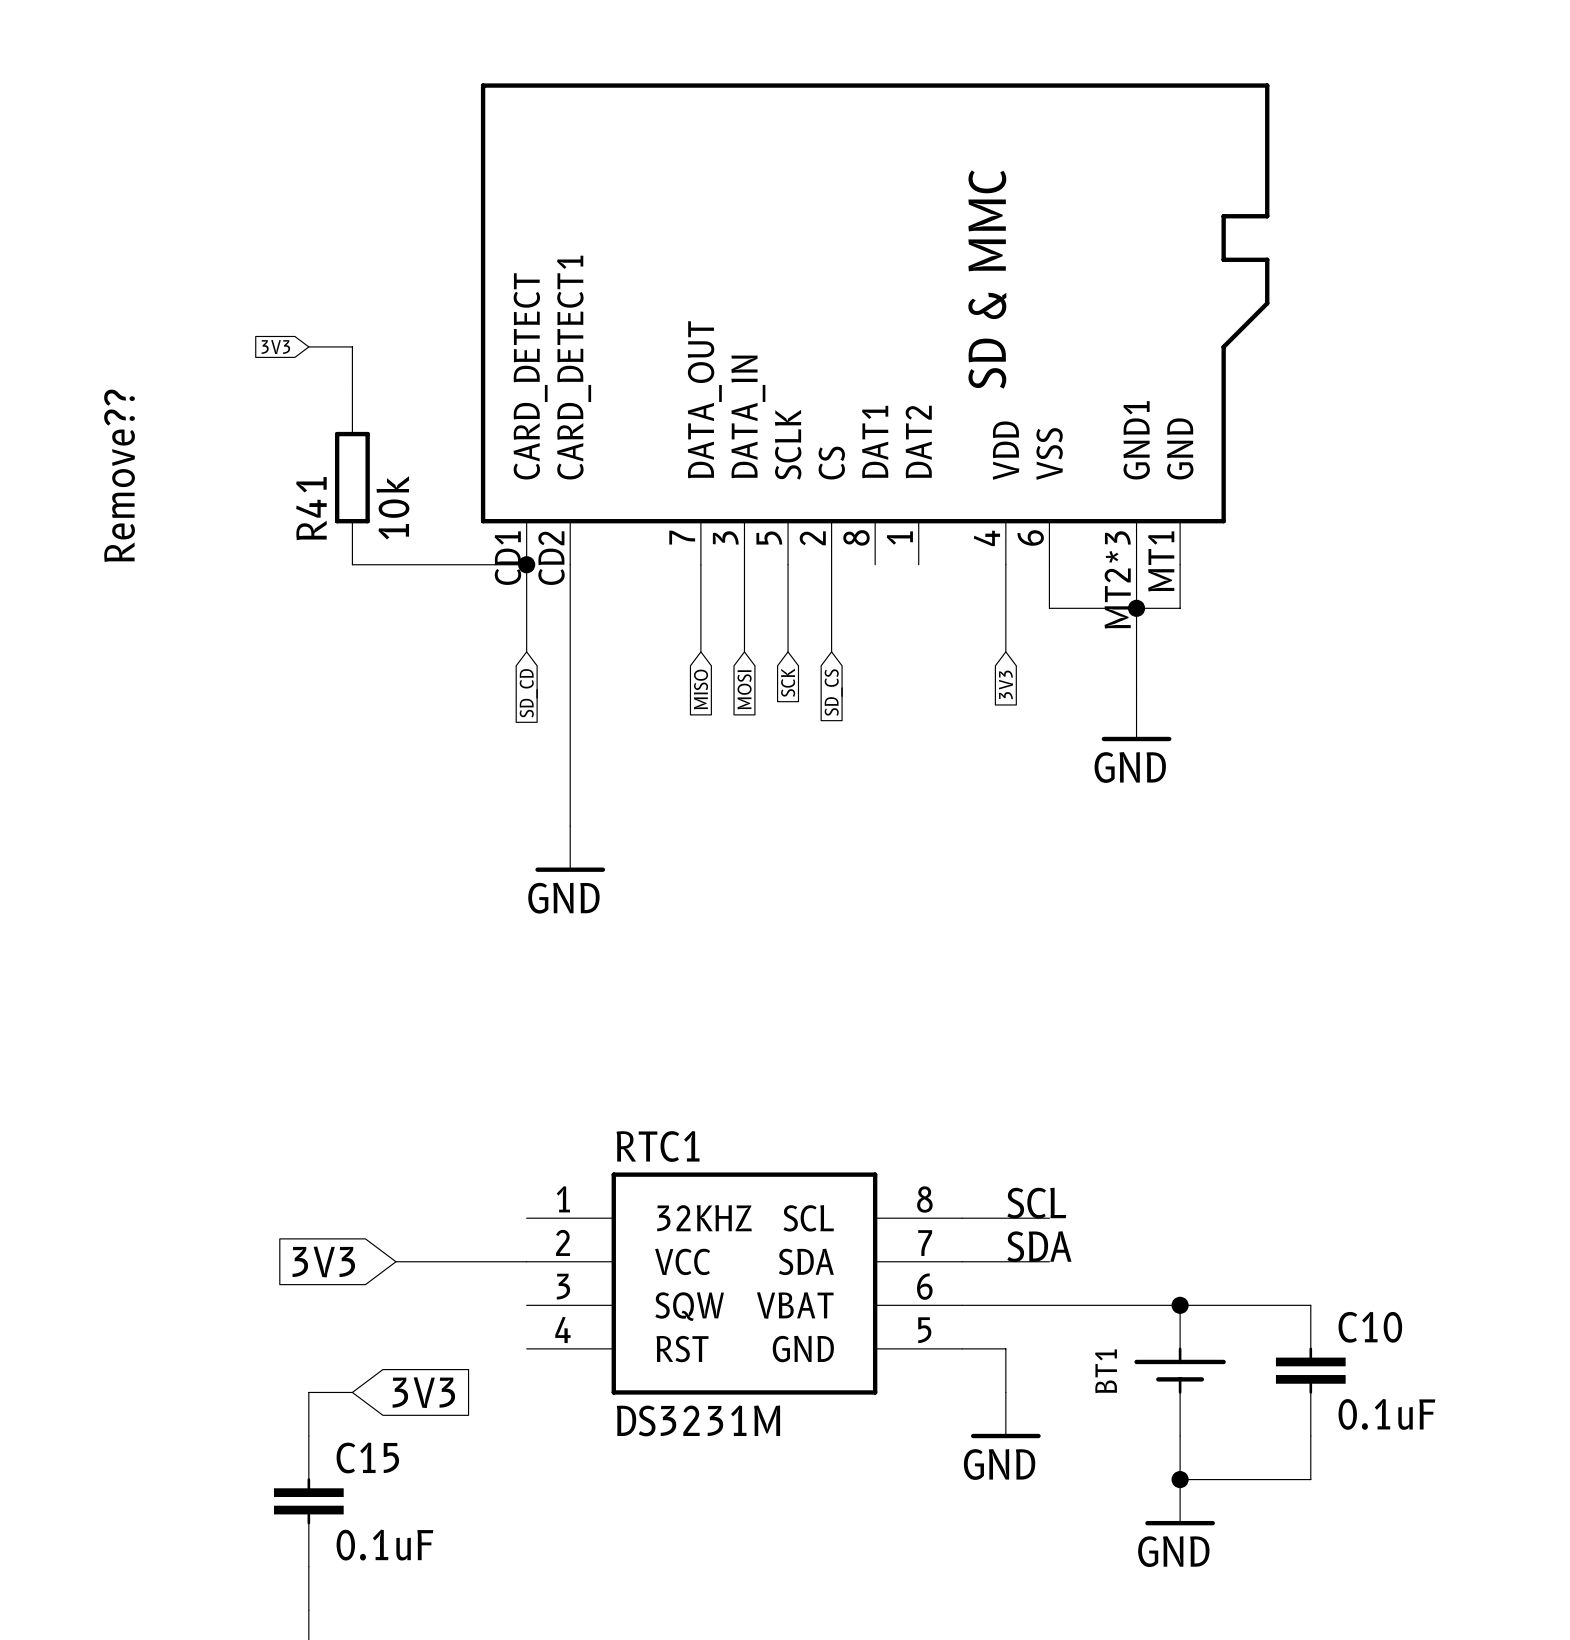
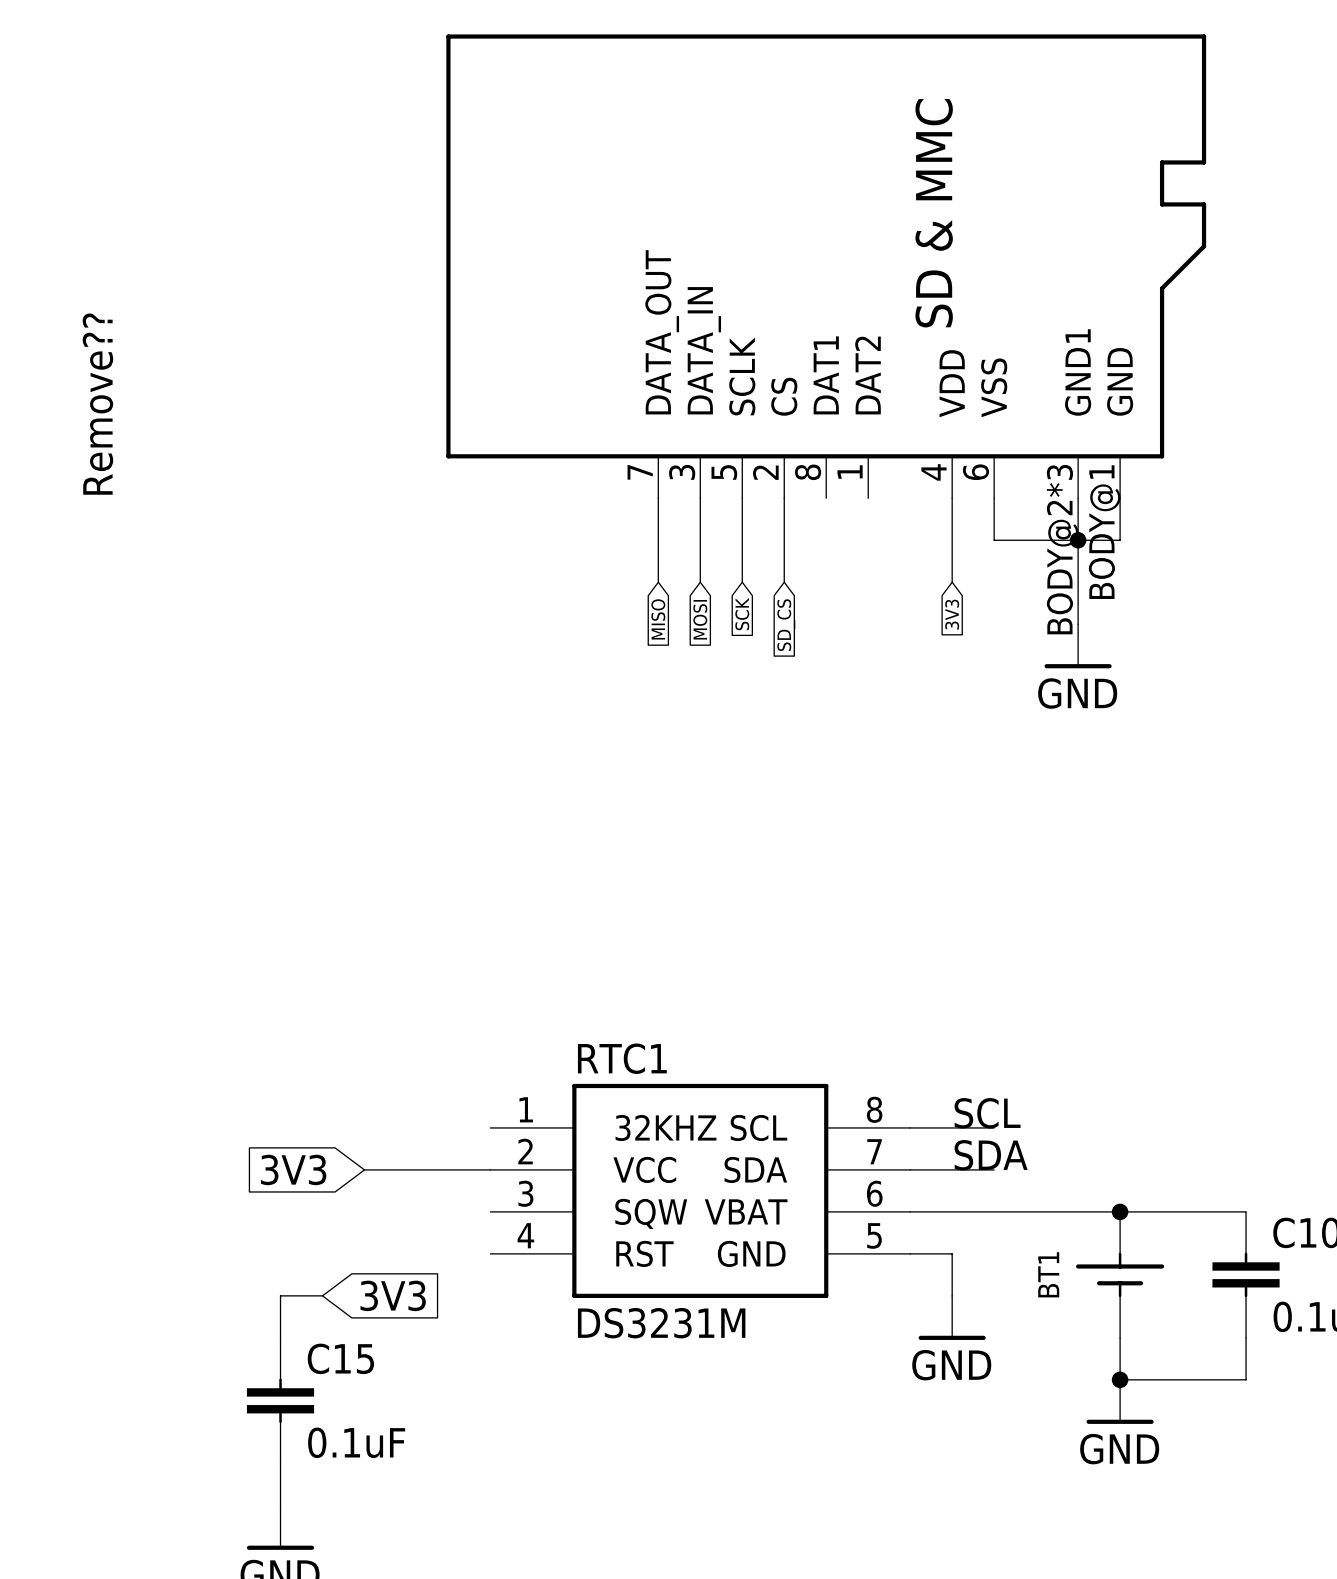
part symbol: [480, 83, 1270, 565] -> [446, 34, 1207, 499]
wire: (308, 346) (352, 346) (352, 390) -> none
global label: 3V3 (275, 347) -> none
R41: 10k (352, 477) -> none
wire: (352, 564) (526, 564) (526, 651) -> none
junction: (526, 564) -> none
wire: (570, 564) (570, 826) -> none
global label: SD_CD (528, 693) -> none
power symbol: GND (570, 849) -> none

